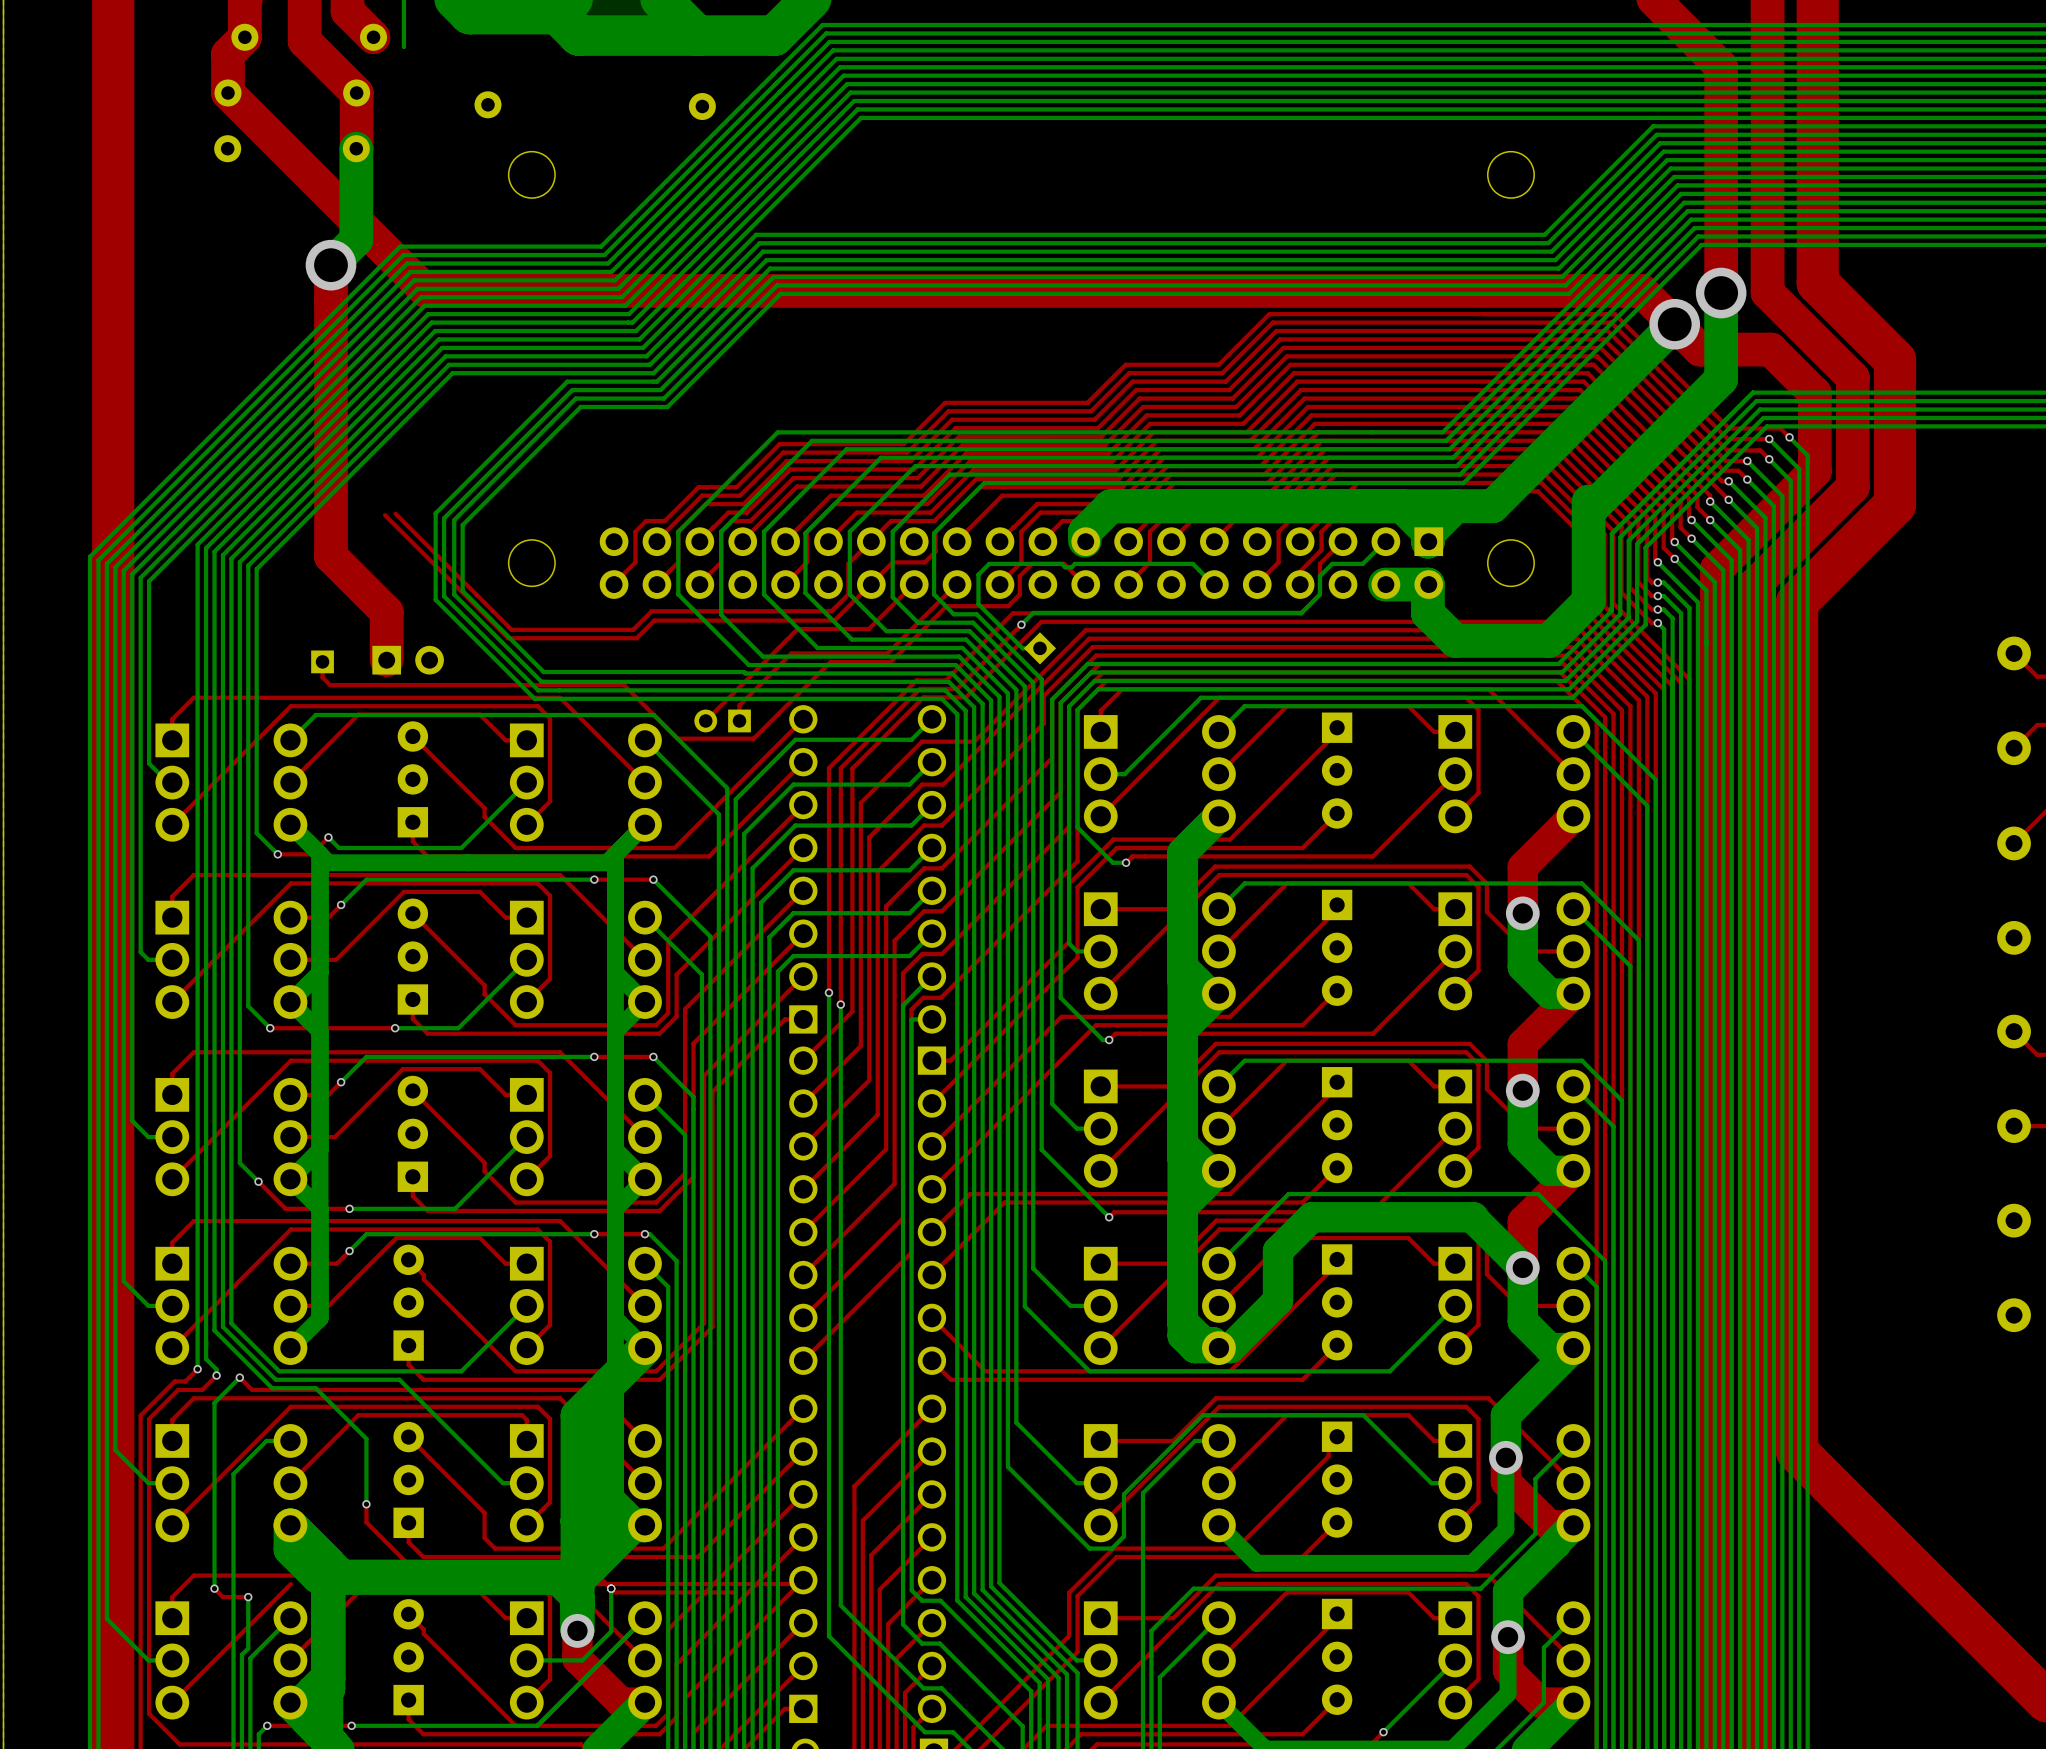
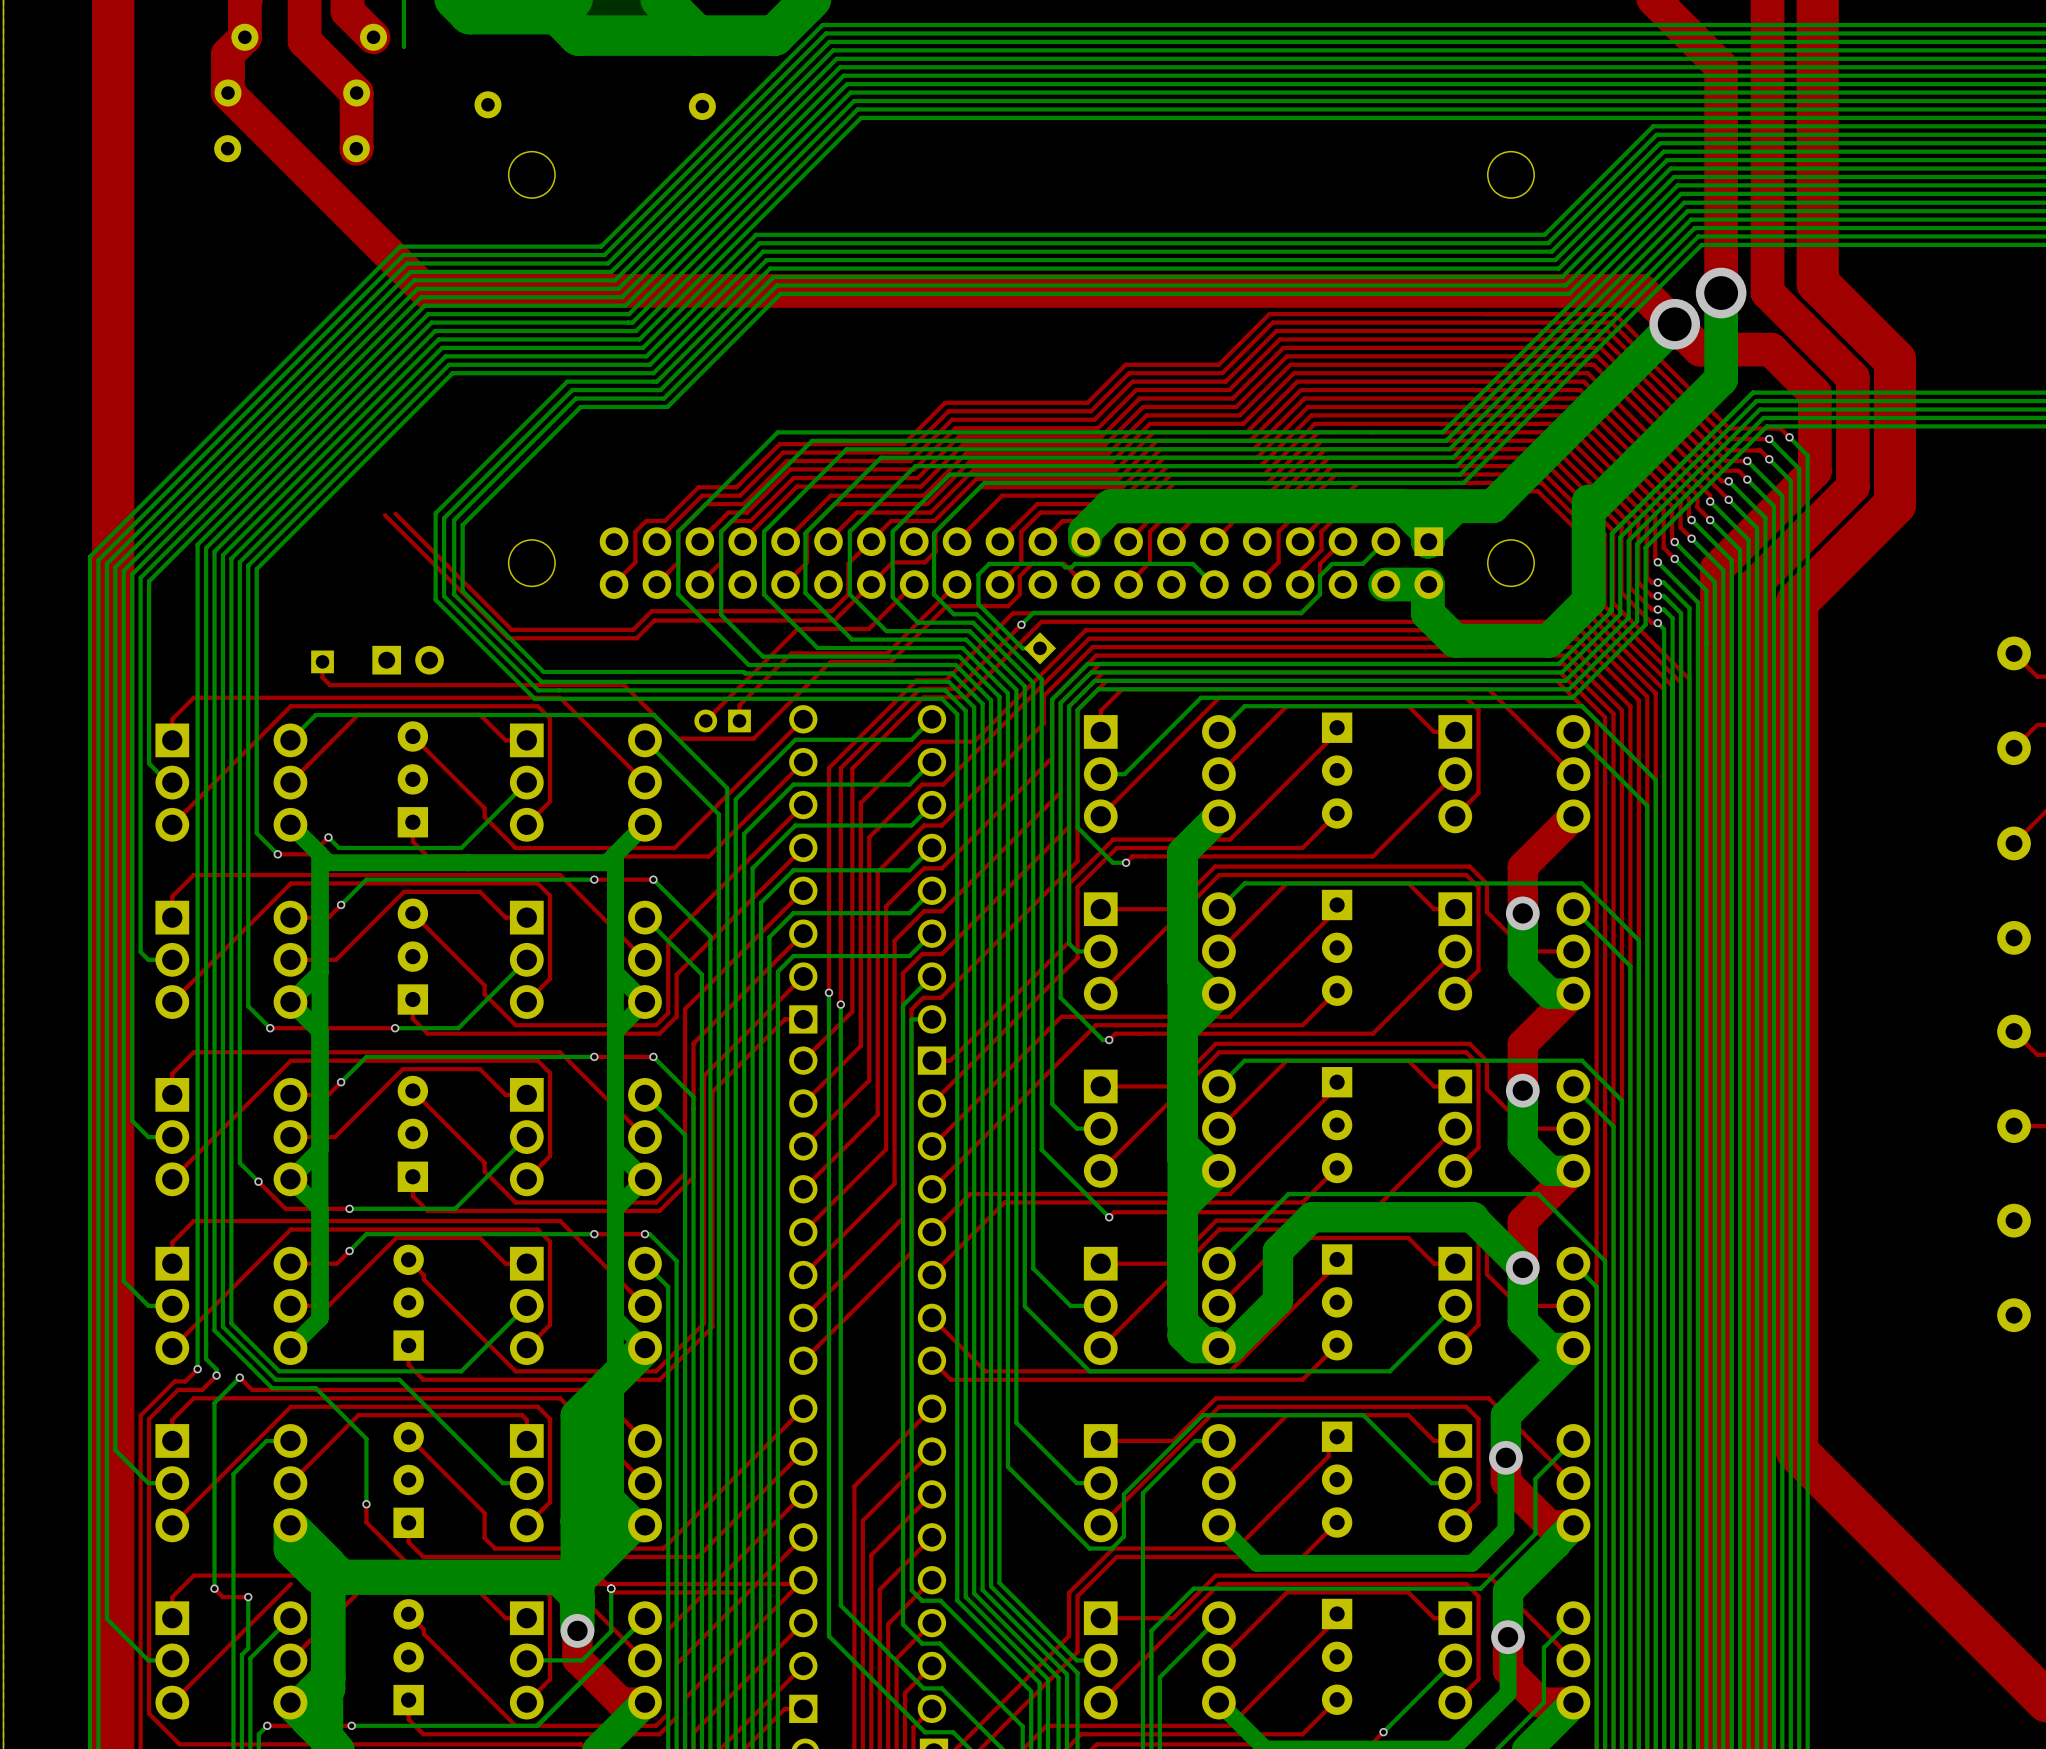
bottom track: (356, 148) (356, 239) (330, 265) -> none
top track: (330, 265) (330, 556) (386, 612) (386, 660) -> none
via: (330, 265) -> none

